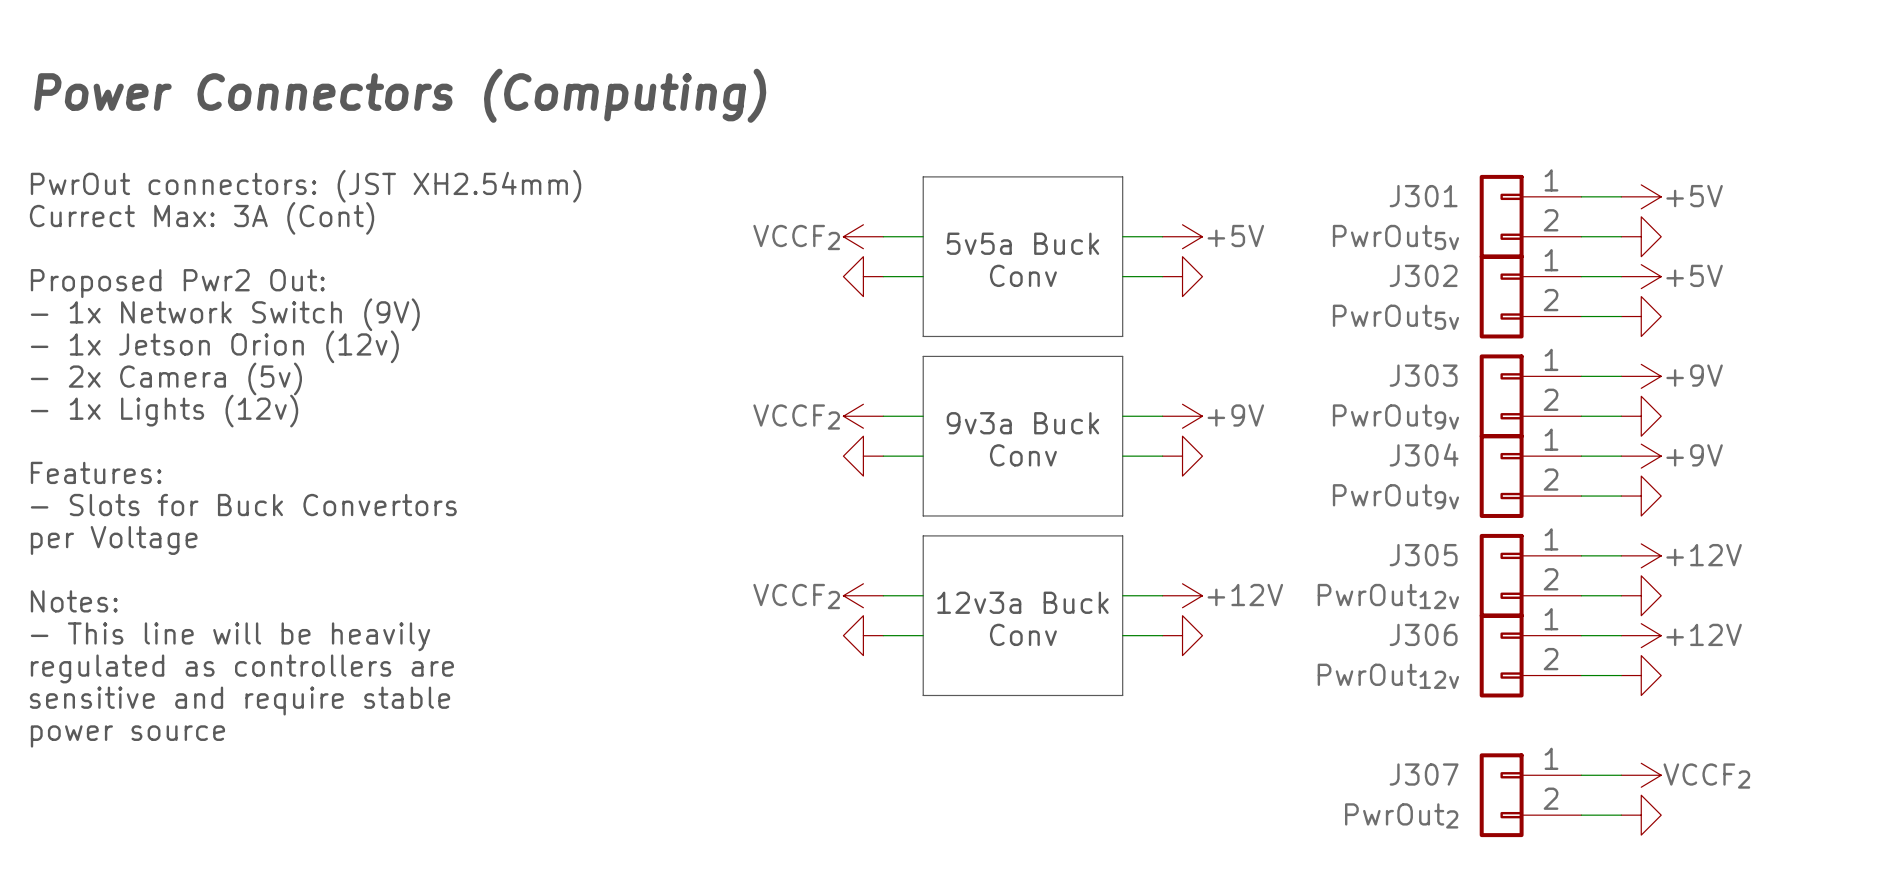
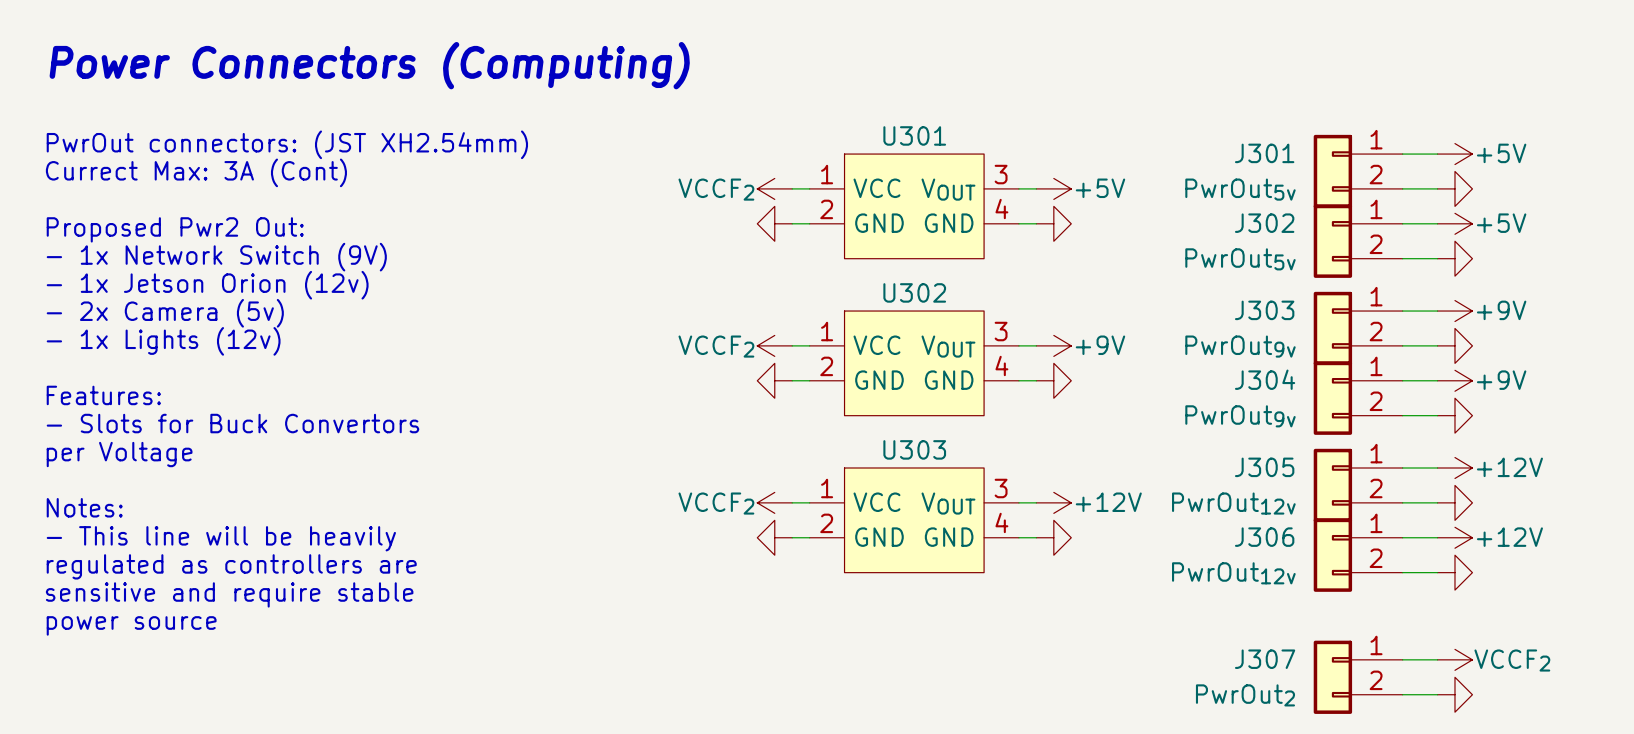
line: (923, 176) (923, 336) (1122, 336) (1122, 176) (923, 176) -> none
text: 5v5a Buck (1022, 243) -> none
U301: none -> (914, 206)
text: Conv (1023, 275) -> none
line: (923, 356) (923, 515) (1122, 515) (1122, 356) (923, 356) -> none
text: 9v3a Buck (1022, 423) -> none
U302: none -> (914, 363)
text: Conv (1023, 455) -> none
line: (923, 535) (1122, 535) (1122, 695) (923, 695) (923, 535) -> none
text: 12v3a Buck (1022, 602) -> none
U303: none -> (914, 520)
text: Conv (1023, 634) -> none

